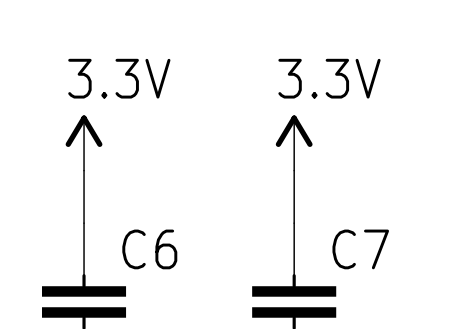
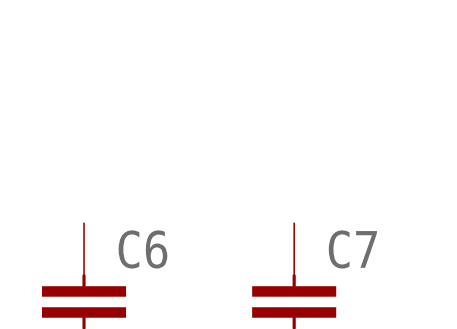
power symbol: 3.3V (84, 143) -> none
power symbol: 3.3V (294, 143) -> none
wire: (84, 170) (84, 223) -> none
wire: (294, 170) (294, 223) -> none

